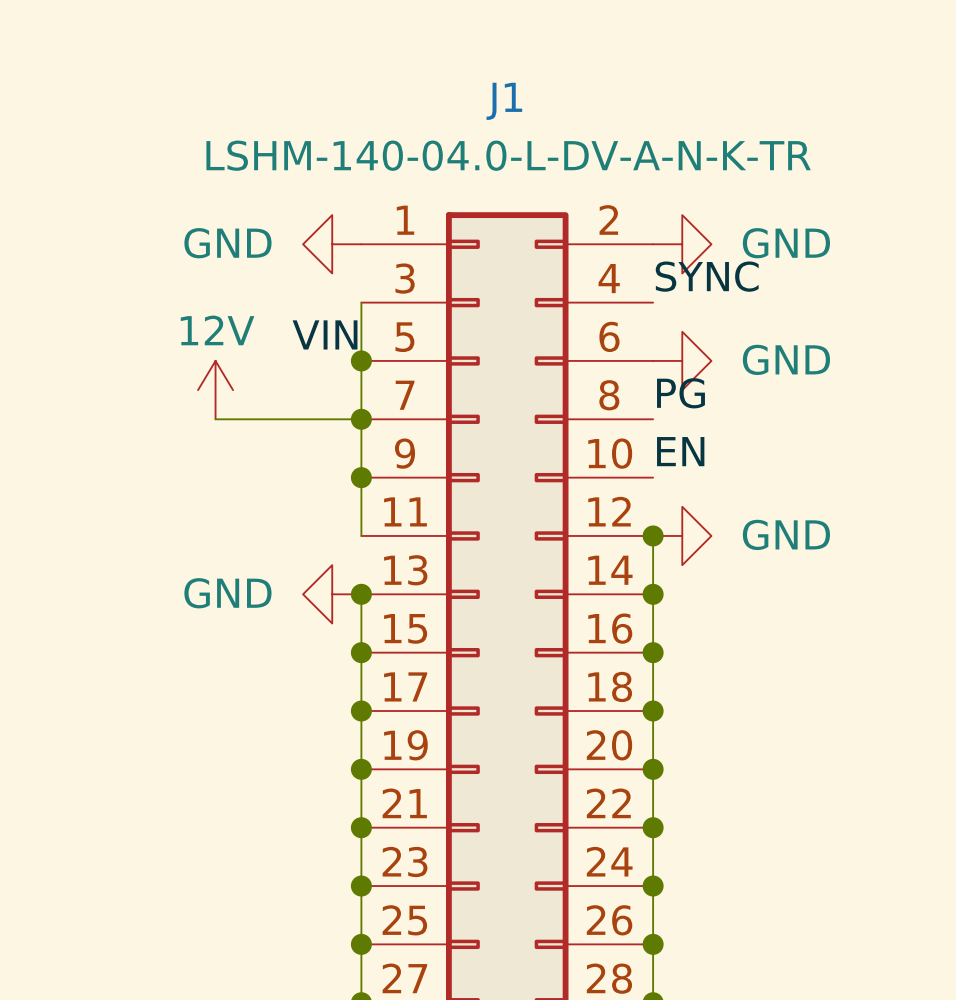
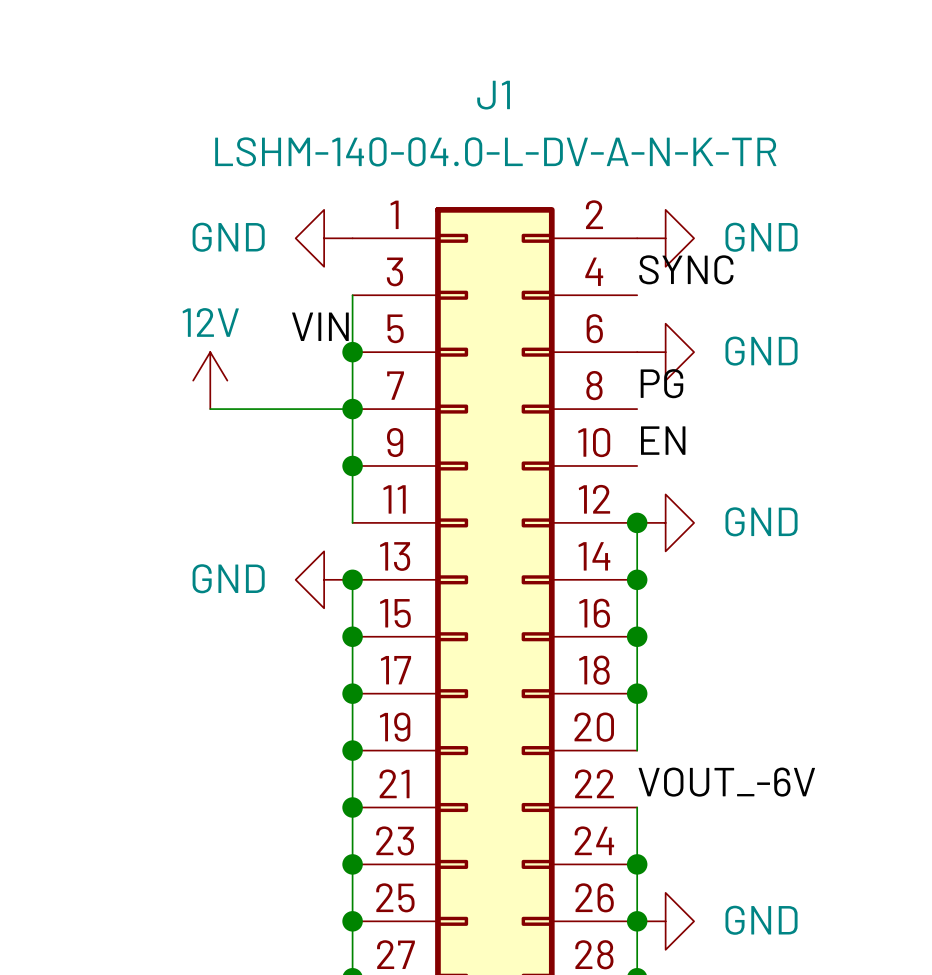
wire: (653, 769) (653, 827) -> none
junction: (653, 769) -> none
label: none -> VOUT_-6V (726, 782)
junction: (653, 827) -> none
power symbol: none -> GND (665, 921)

